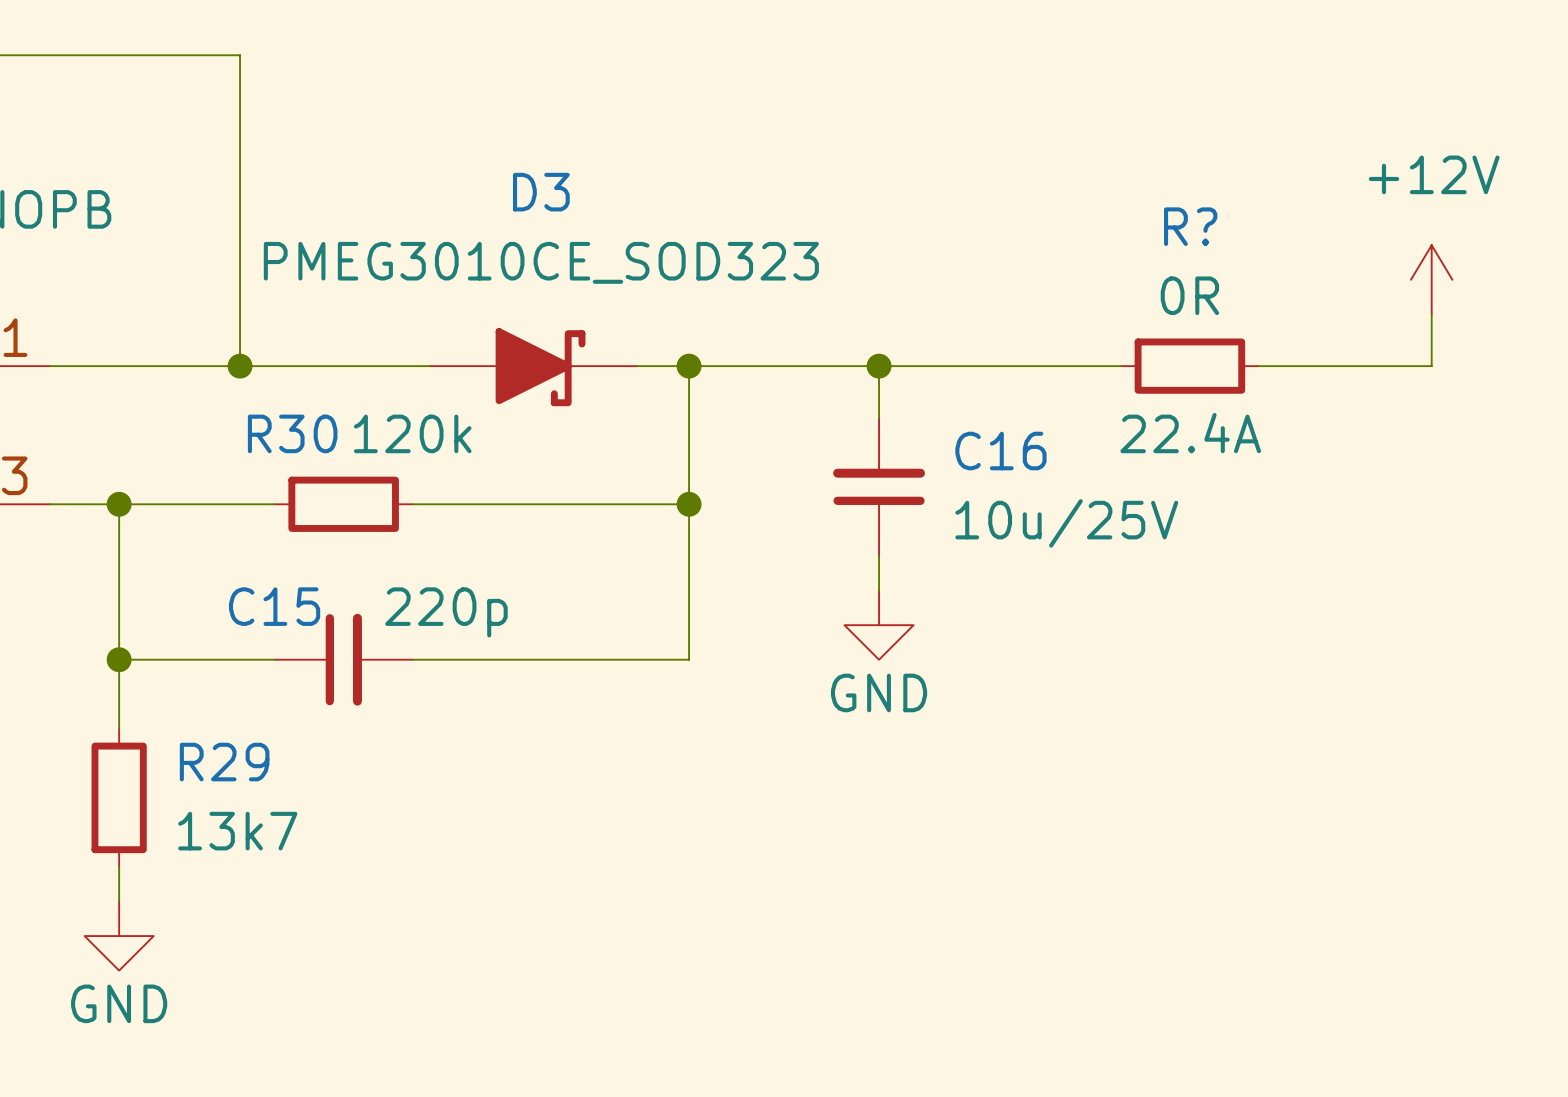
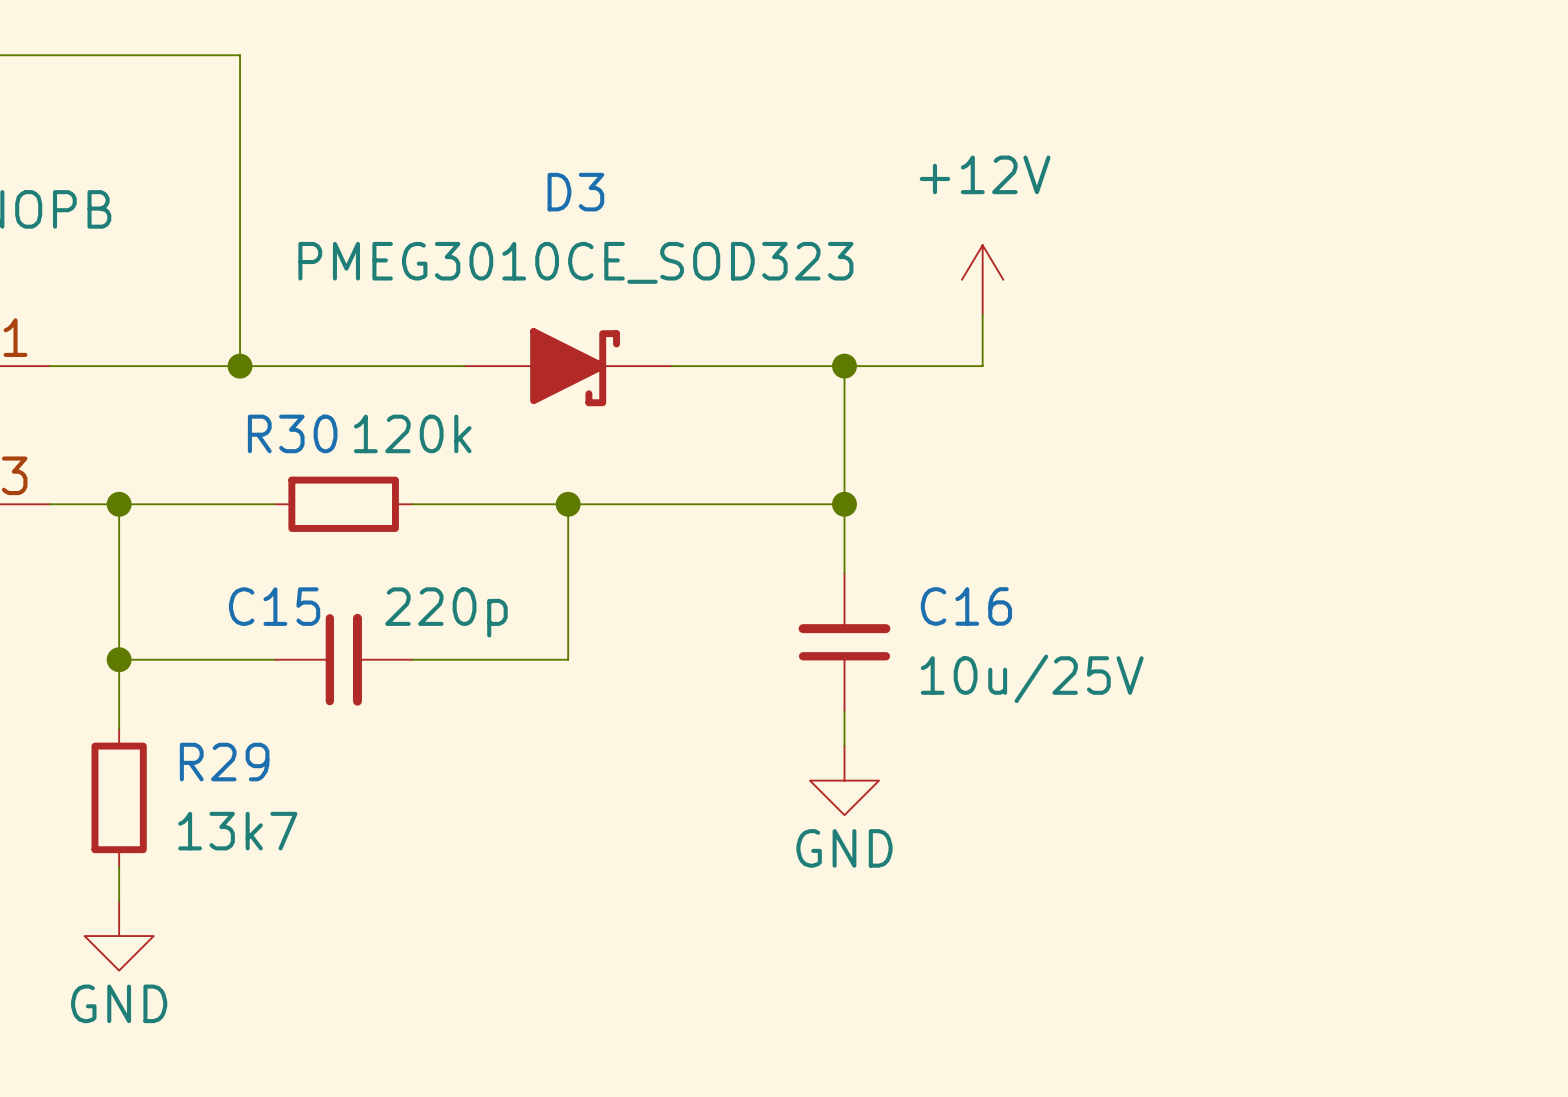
power symbol position: +12V (1431, 279) -> +12V (982, 279)
wire: (1431, 314) (1431, 366) (1258, 366) -> none
wire: (689, 366) (689, 659) (568, 659) -> (568, 504) (568, 659)
junction: (689, 366) -> none
wire: none -> (844, 366) (844, 504)
wire: (879, 366) (879, 417) -> none
junction position: (879, 366) -> (844, 366)
wire: (982, 366) (1120, 366) -> (982, 366) (982, 314)
R?: (1189, 366) -> none
D3 position: (533, 367) -> (568, 367)
C16 position: (879, 487) -> (844, 642)
junction: none -> (568, 504)
wire: none -> (689, 504) (844, 504)
junction: (689, 504) -> none
wire: none -> (844, 504) (844, 573)
junction: none -> (844, 504)
wire: (879, 556) (879, 590) -> (844, 711) (844, 746)
power symbol position: GND (879, 625) -> GND (844, 780)

